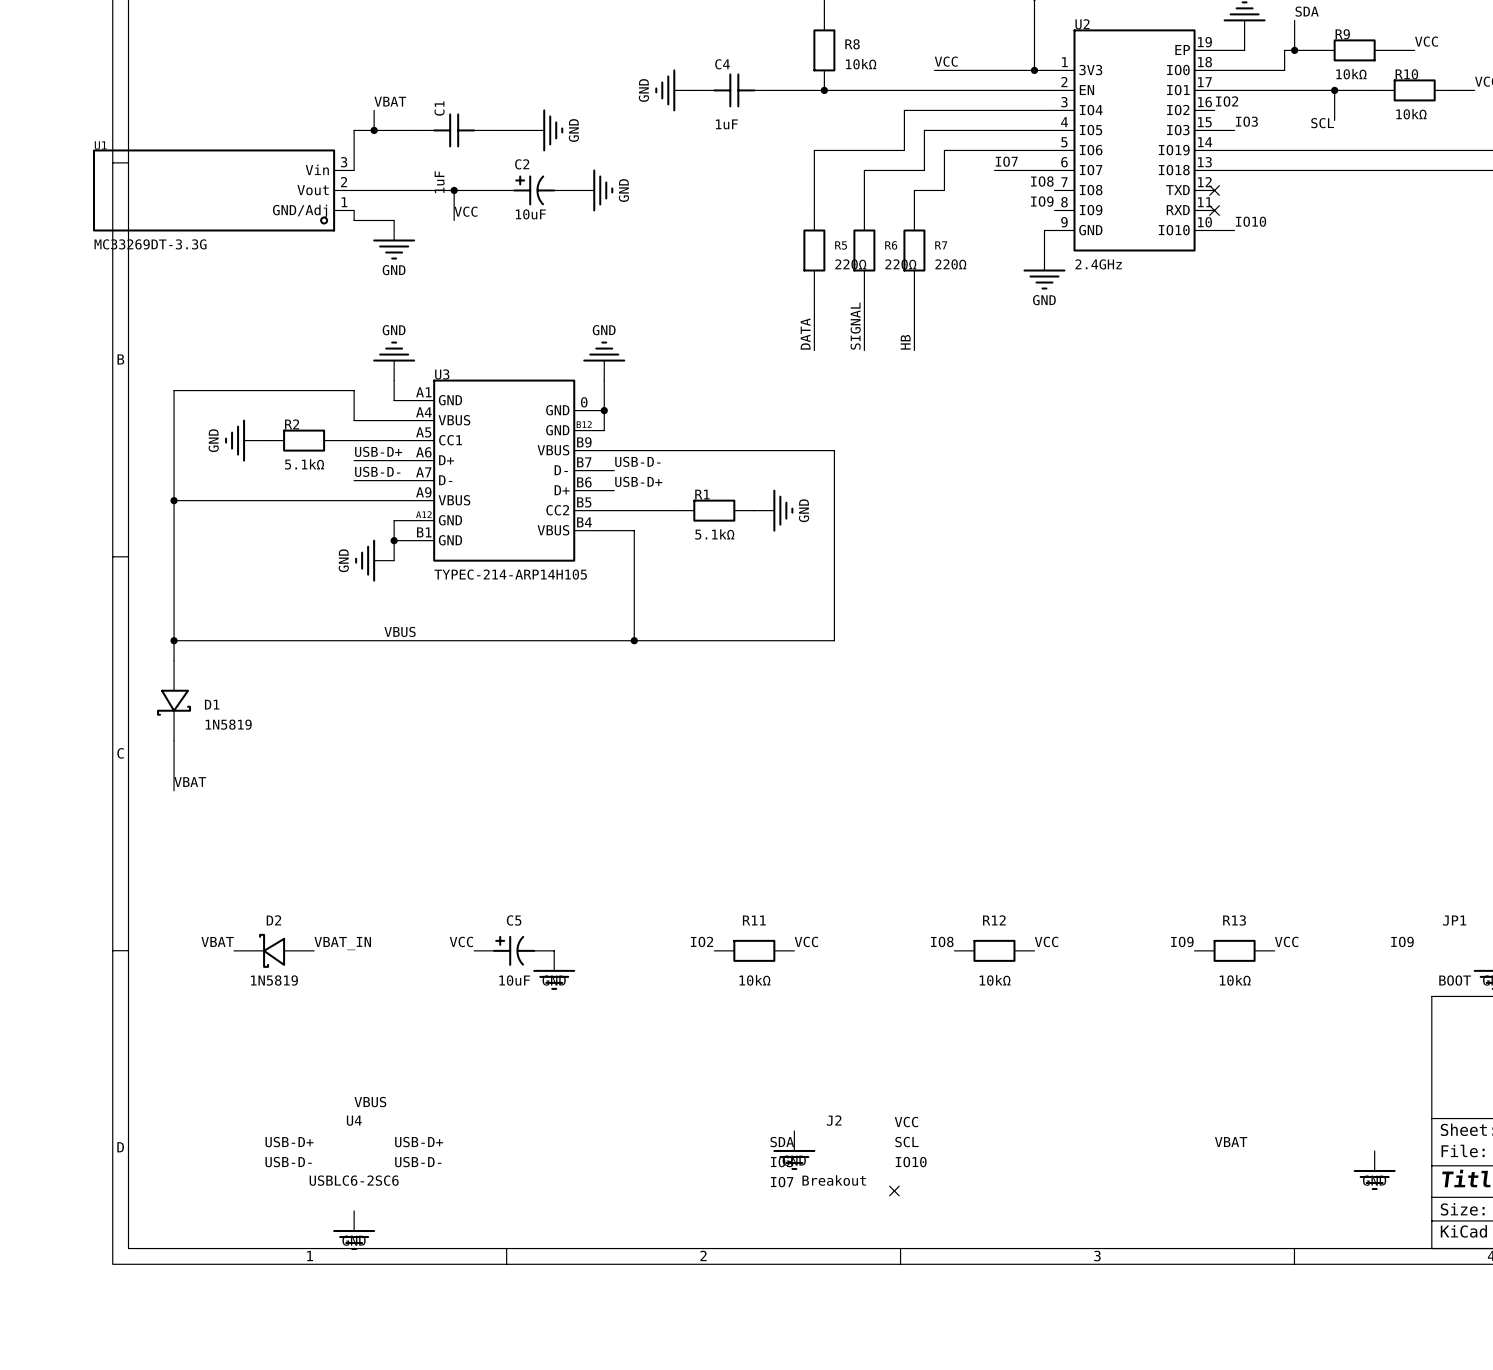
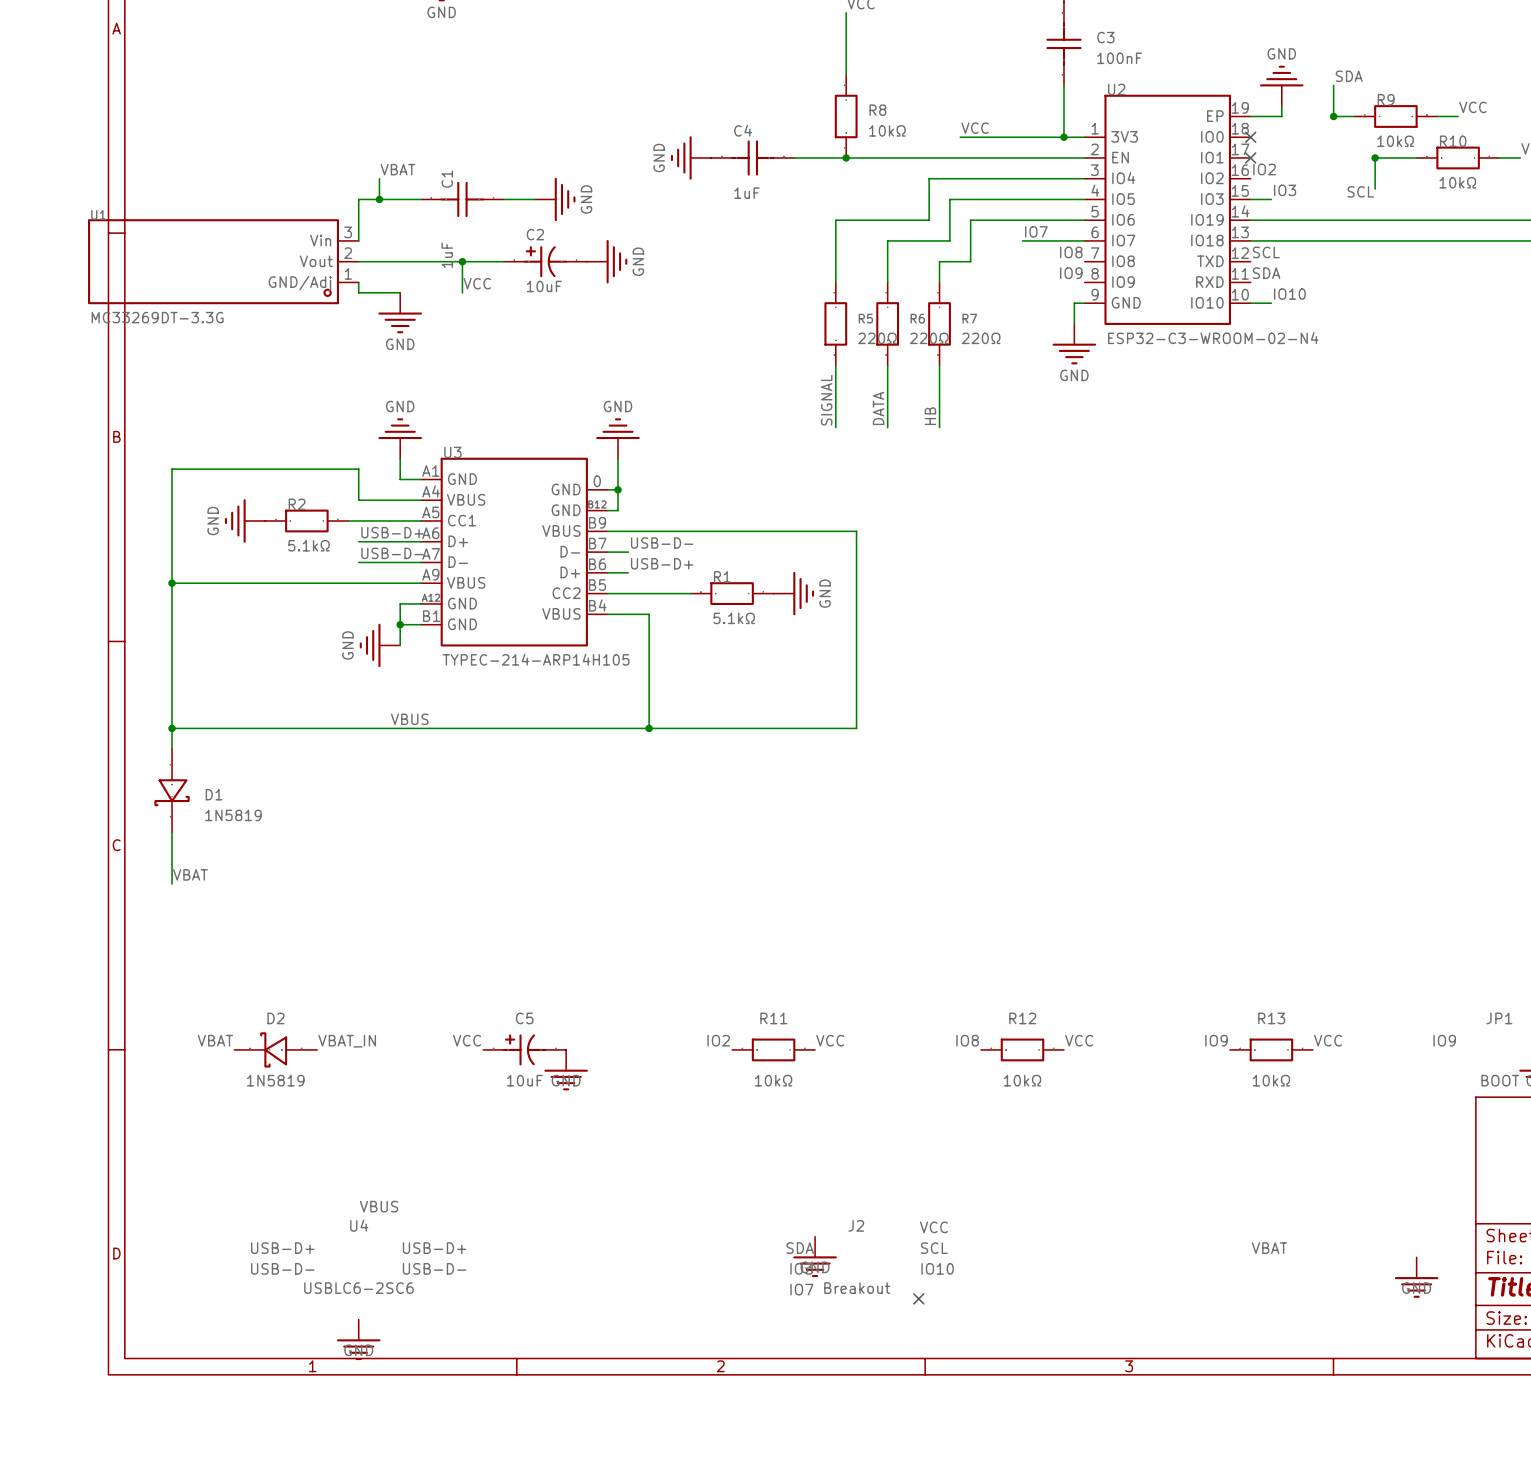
wire: (1294, 50) (1284, 50) (1284, 70) (1214, 70) -> none
no-connect mark: none -> (1250, 137)
wire: (1214, 90) (1334, 90) -> none
no-connect mark: none -> (1250, 157)
label: none -> SCL (1266, 252)
no-connect mark: (1214, 190) -> none
label: none -> SDA (1266, 273)
no-connect mark: (1214, 210) -> none
U2 value: 2.4GHz (1098, 264) -> ESP32-C3-WROOM-02-N4 (1213, 338)
label: SIGNAL (855, 326) -> DATA (878, 408)
label: DATA (805, 334) -> SIGNAL (826, 400)

